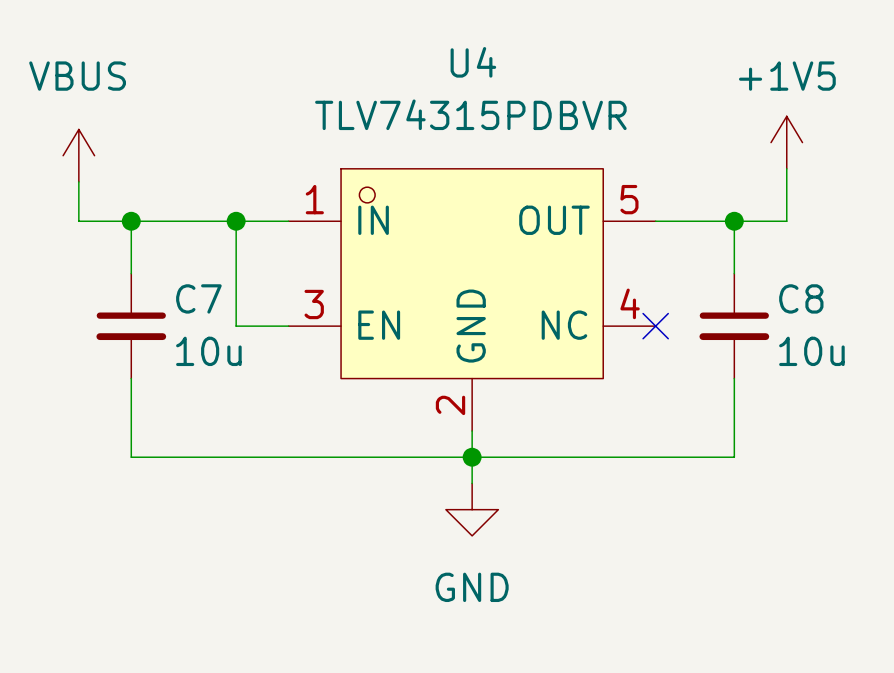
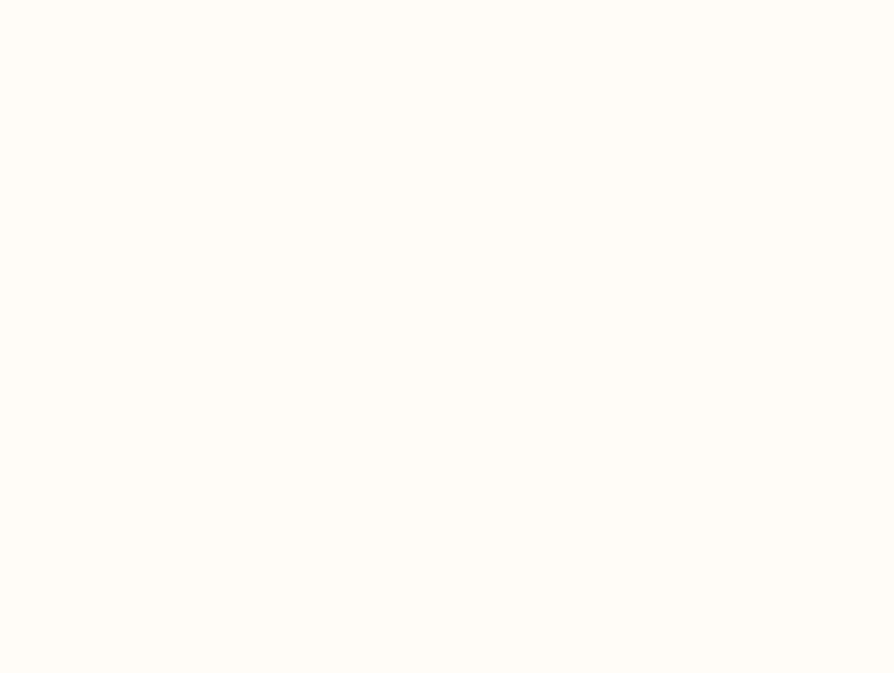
power symbol: +1V5 (786, 142) -> none
power symbol: VBUS (78, 155) -> none
wire: (786, 168) (786, 221) (655, 221) -> none
wire: (78, 181) (78, 221) (288, 221) -> none
wire: (131, 221) (131, 273) -> none
junction: (131, 221) -> none
wire: (236, 221) (236, 326) (288, 326) -> none
junction: (236, 221) -> none
wire: (734, 221) (734, 273) -> none
junction: (734, 221) -> none
U4: TLV74315PDBVR (472, 299) -> none
C7: 10u (131, 326) -> none
no-connect mark: (655, 326) -> none
C8: 10u (734, 326) -> none
wire: (131, 378) (131, 457) (734, 457) (734, 378) -> none
wire: (472, 431) (472, 483) -> none
junction: (472, 457) -> none
power symbol: GND (472, 509) -> none

